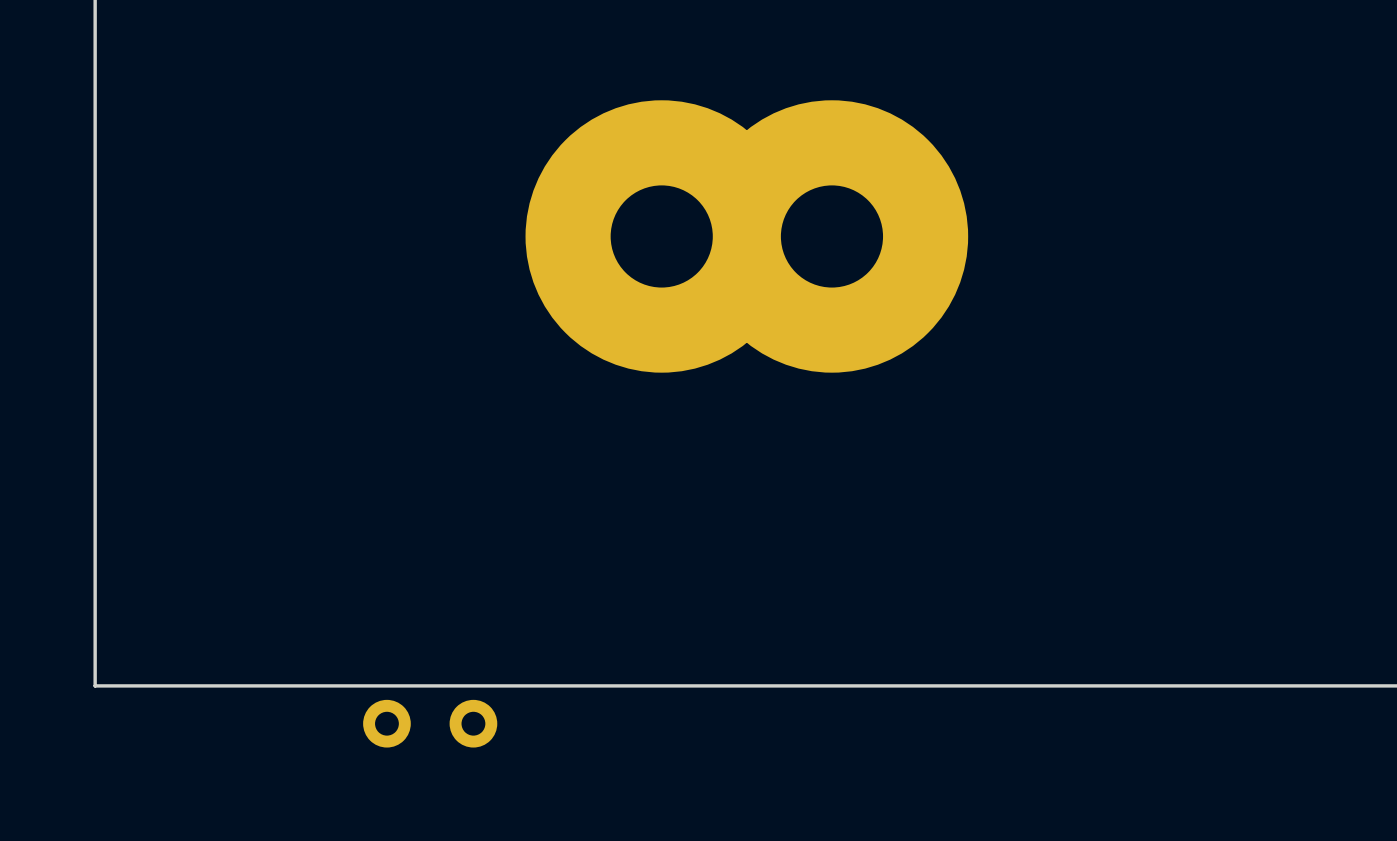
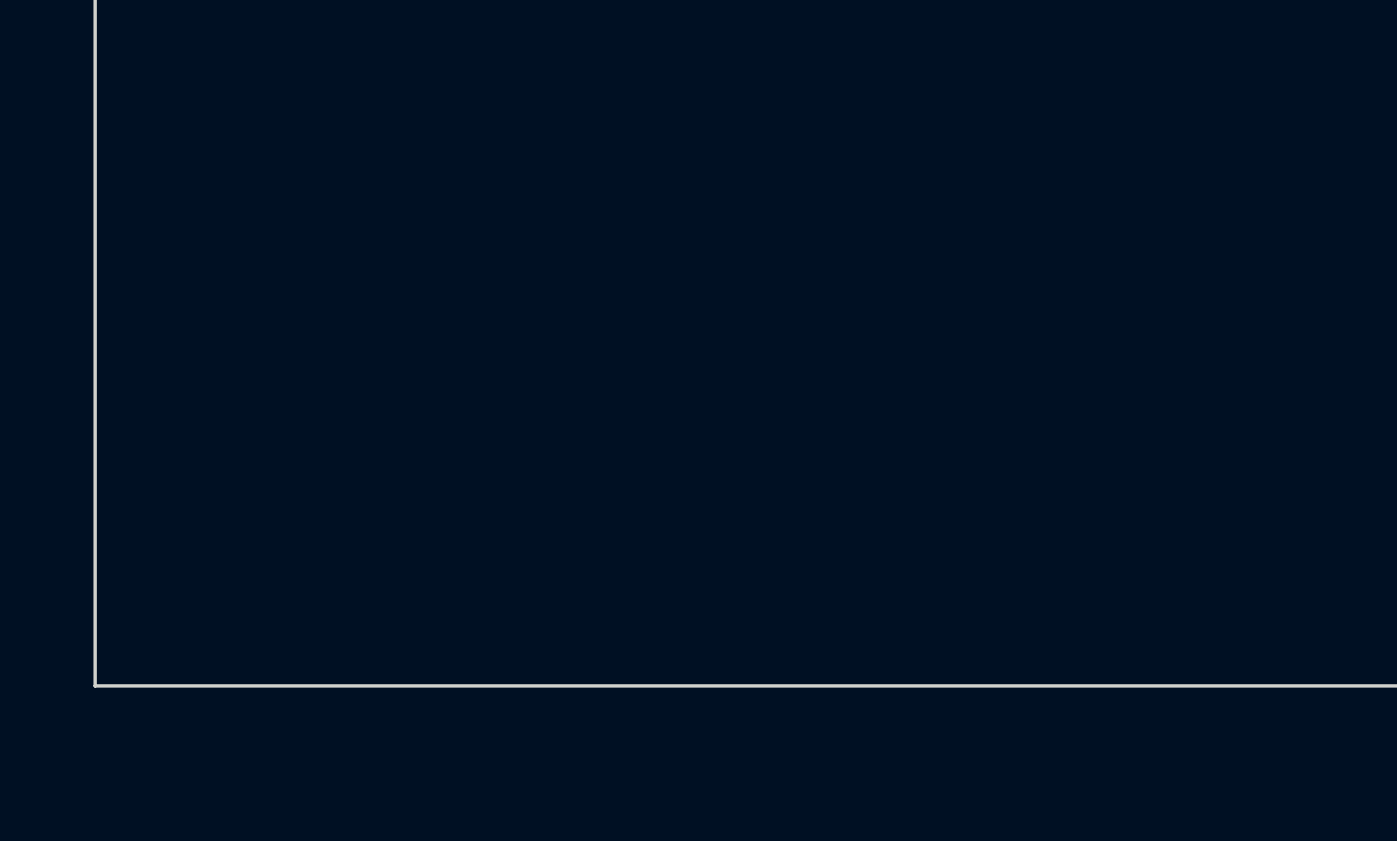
part: (746, 236) -> none
part: (430, 723) -> none

